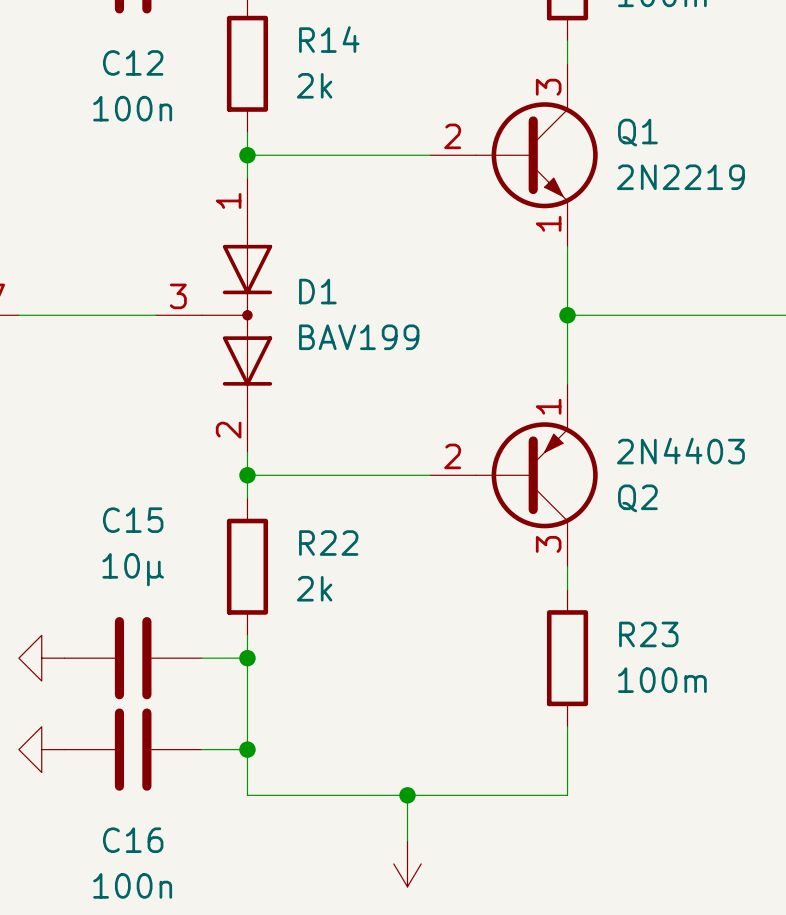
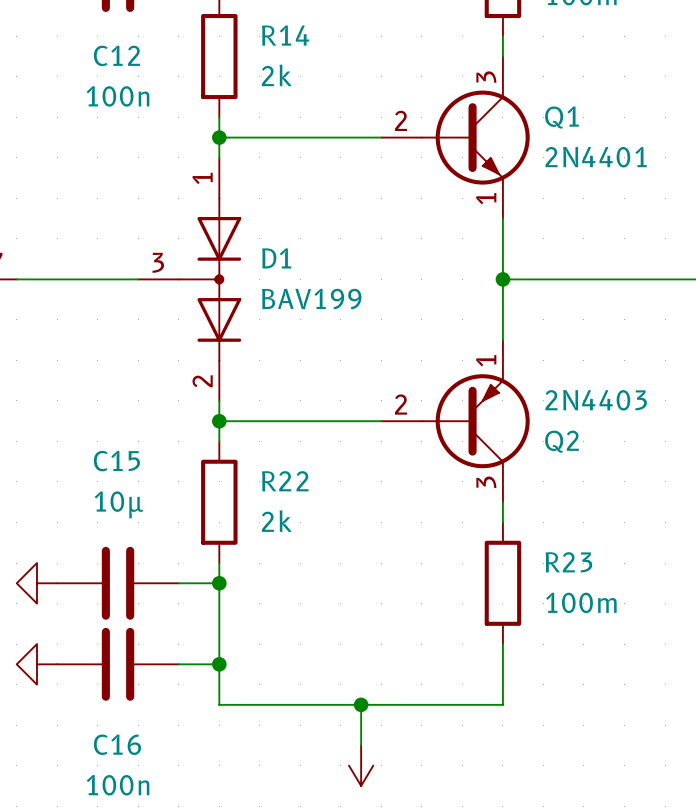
Q1 value: 2N2219 (680, 177) -> 2N4401 (596, 157)

